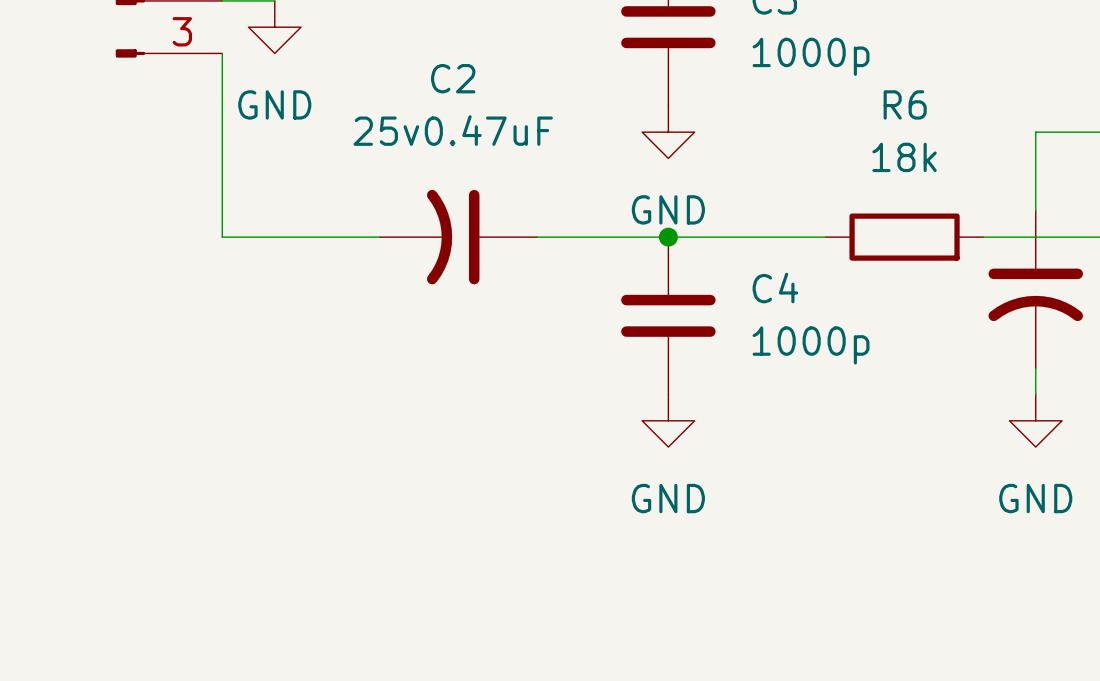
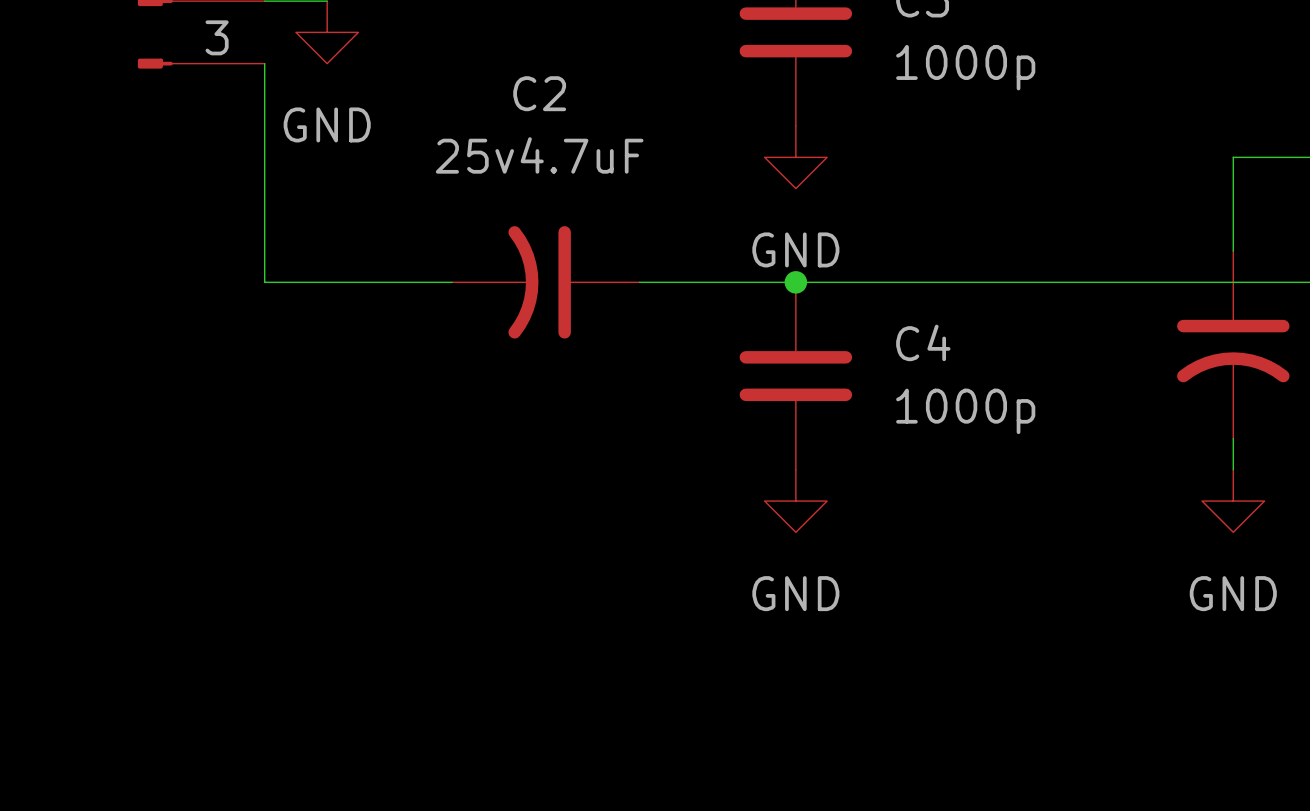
C2 value: 25v0.47uF (453, 130) -> 25v4.7uF (539, 155)
wire: none -> (983, 282) (1170, 282)
R6: 18k (904, 237) -> none

